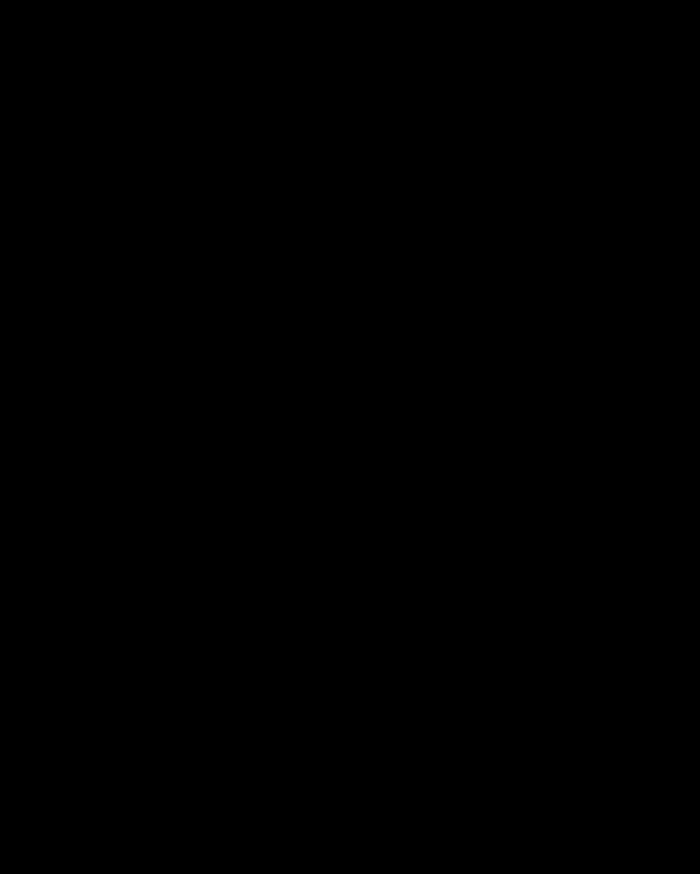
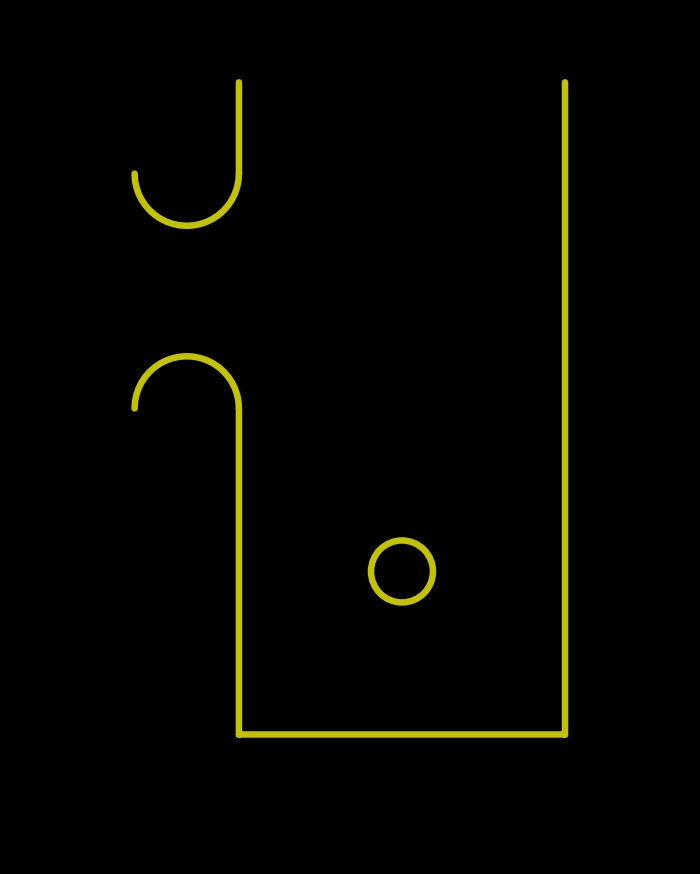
board edge: none -> (238, 82) (238, 180) (231, 199) (218, 215) (206, 221) (193, 225) (179, 225) (166, 221) (154, 215) (145, 205) (138, 193) (134, 173)
board edge: none -> (565, 82) (565, 734) (238, 734) (238, 408) (237, 394) (228, 376) (218, 367) (200, 358) (179, 356) (160, 363) (149, 371) (138, 388) (134, 408)
round board edge: none -> [367, 537, 437, 606]

